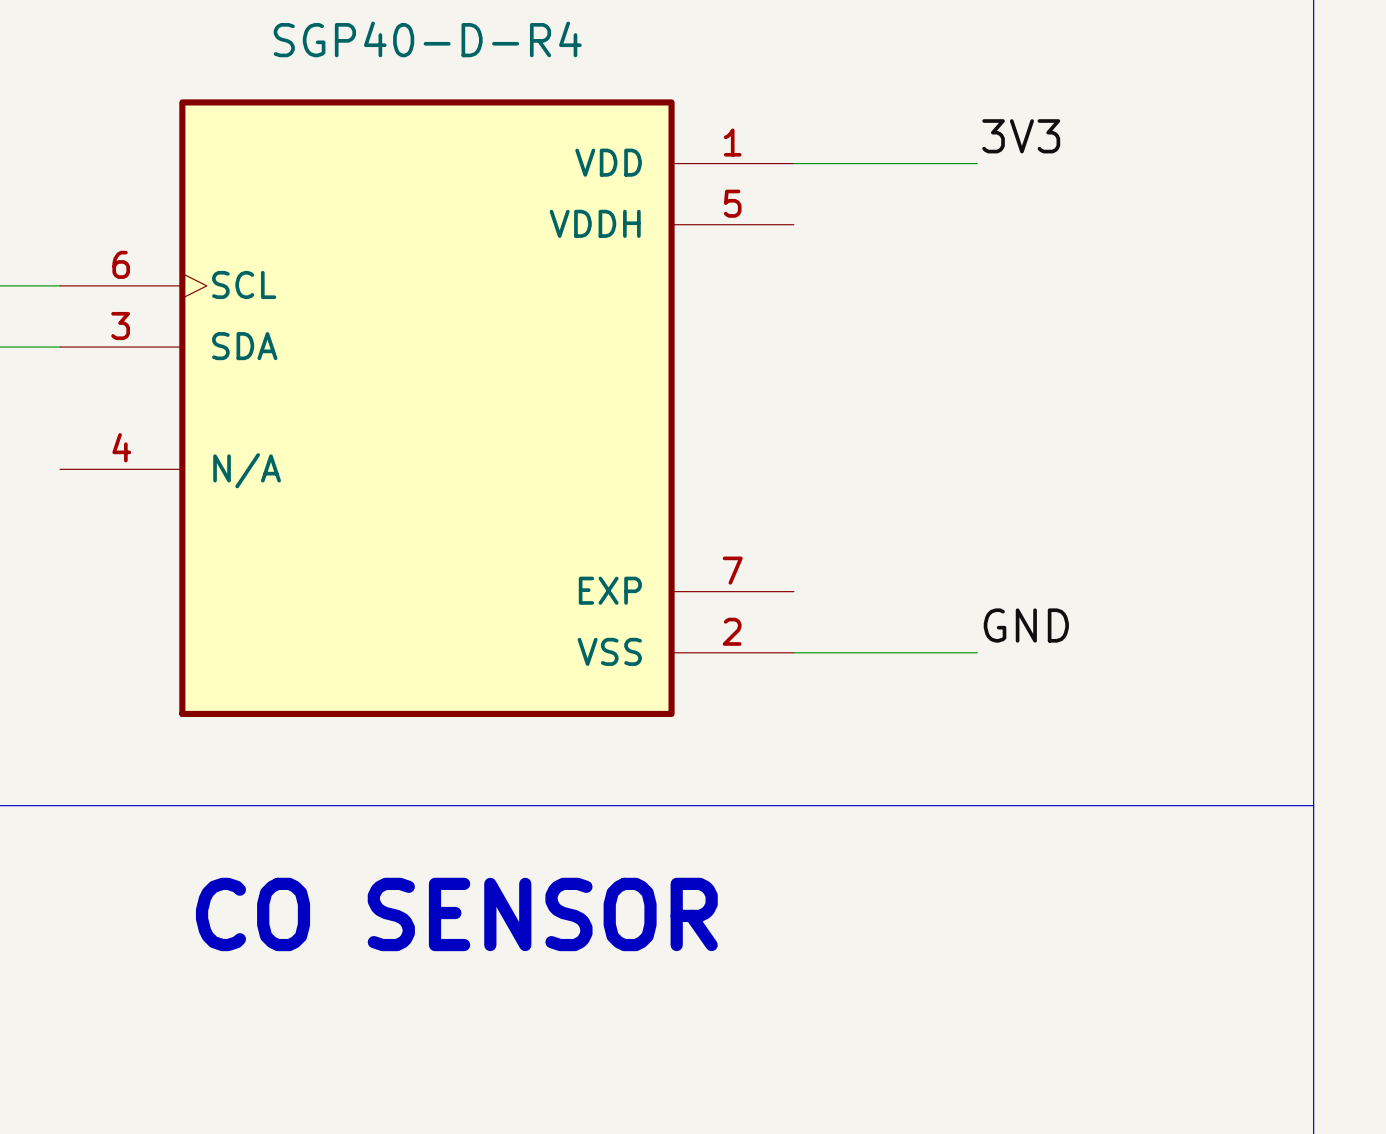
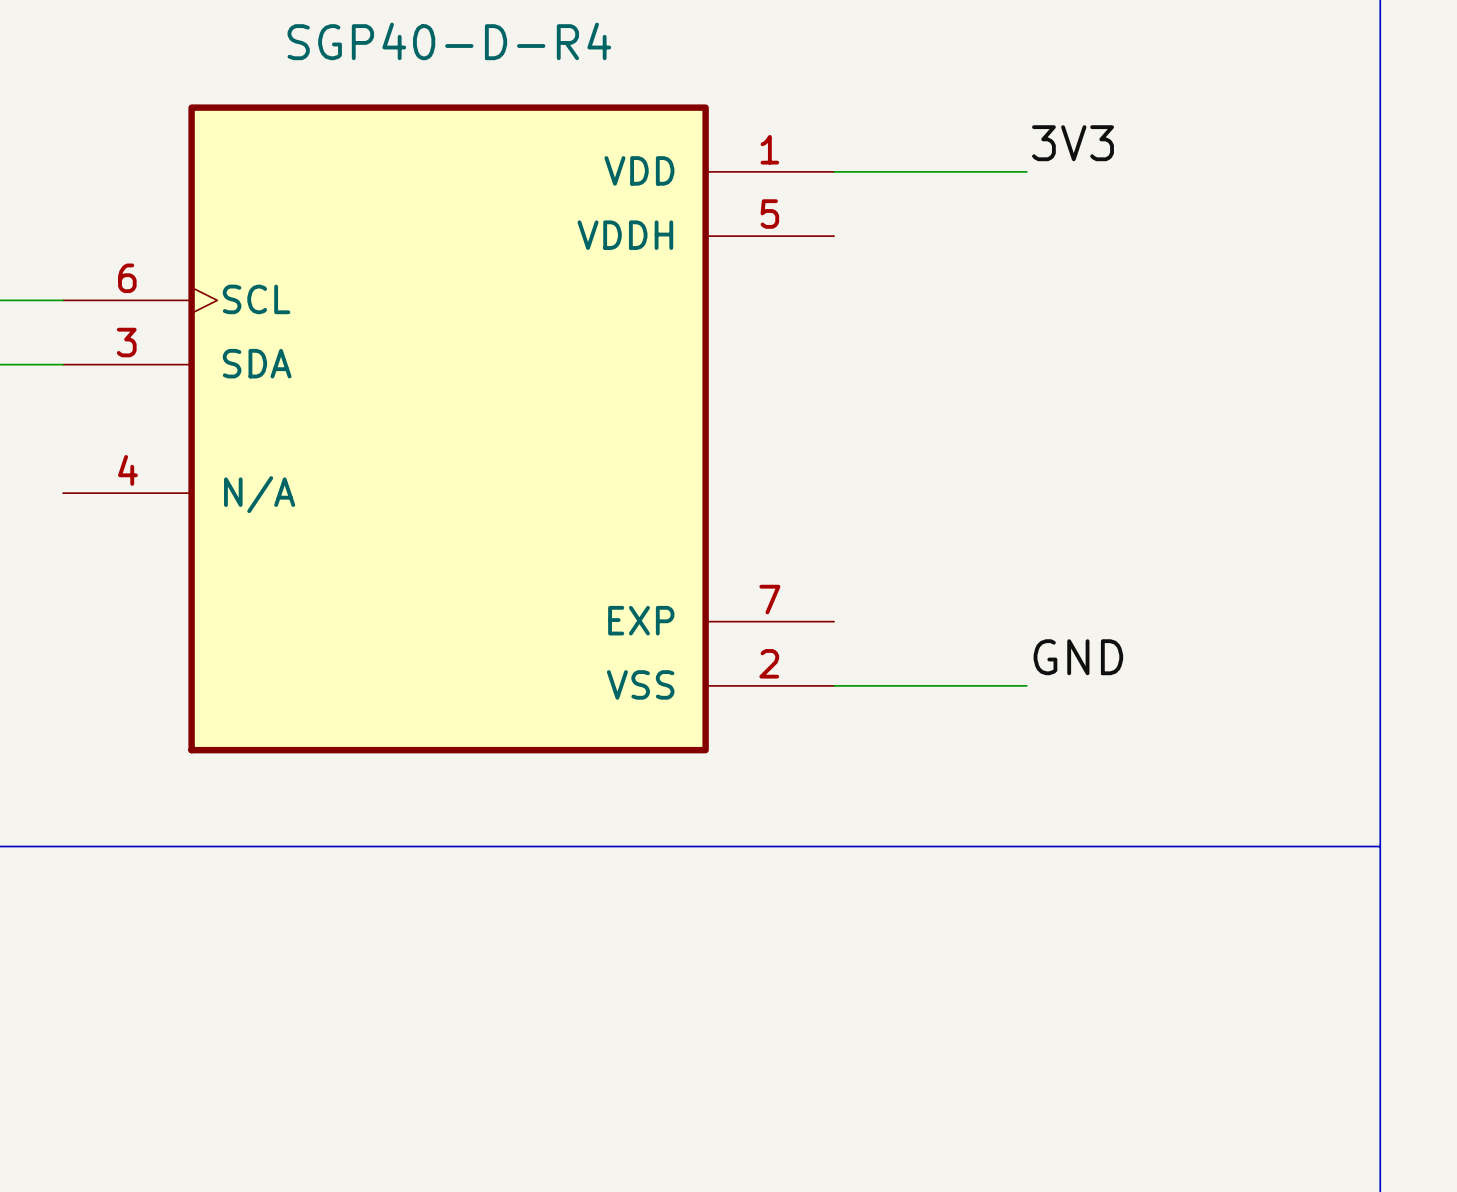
text: CO SENSOR (456, 914) -> none

